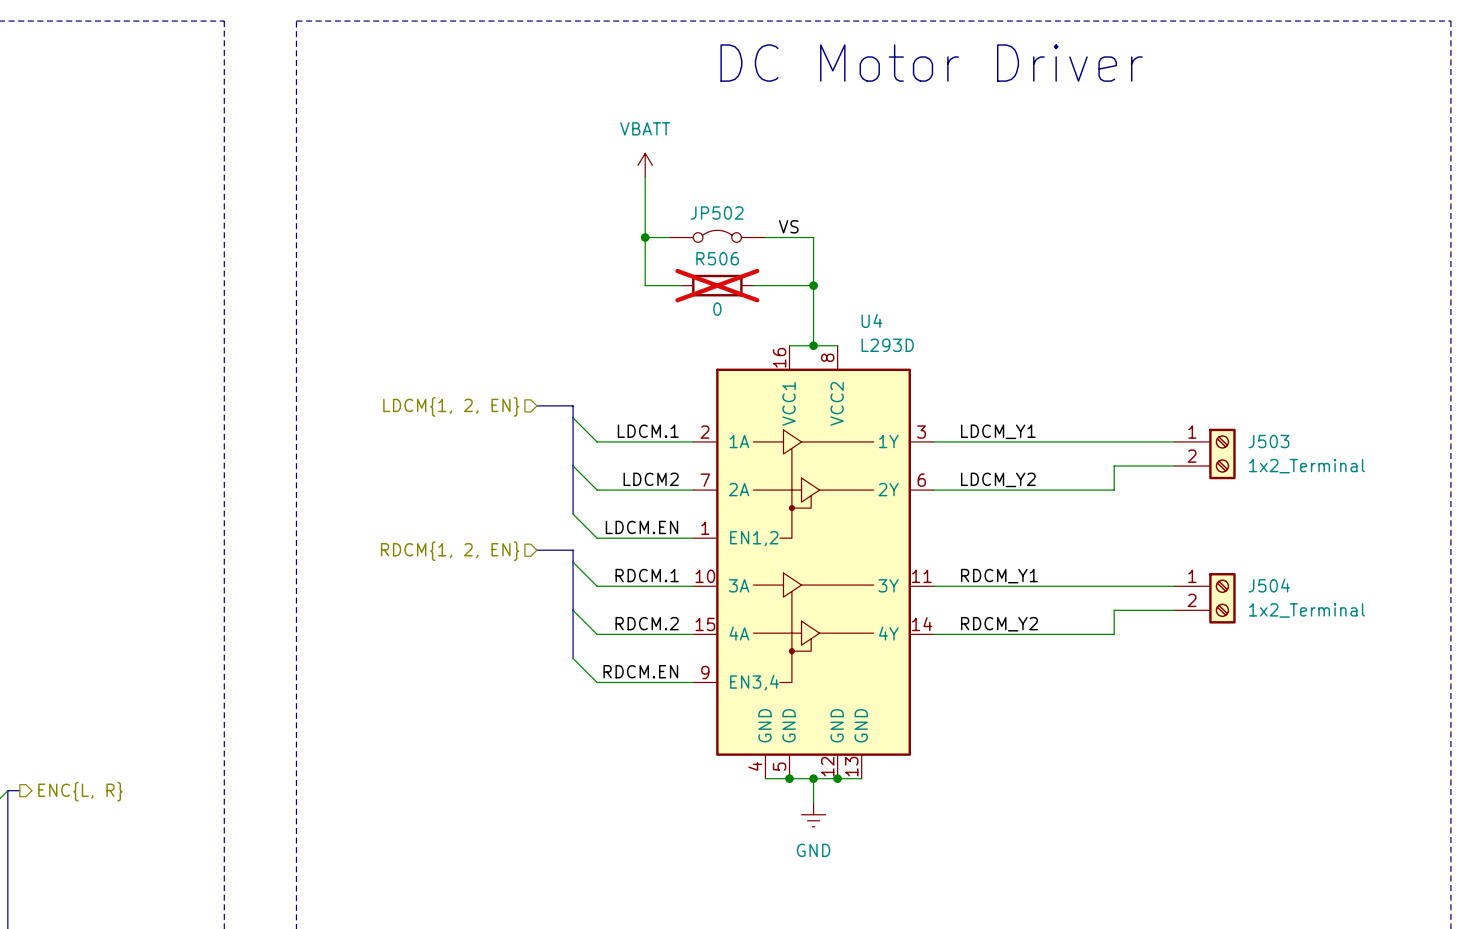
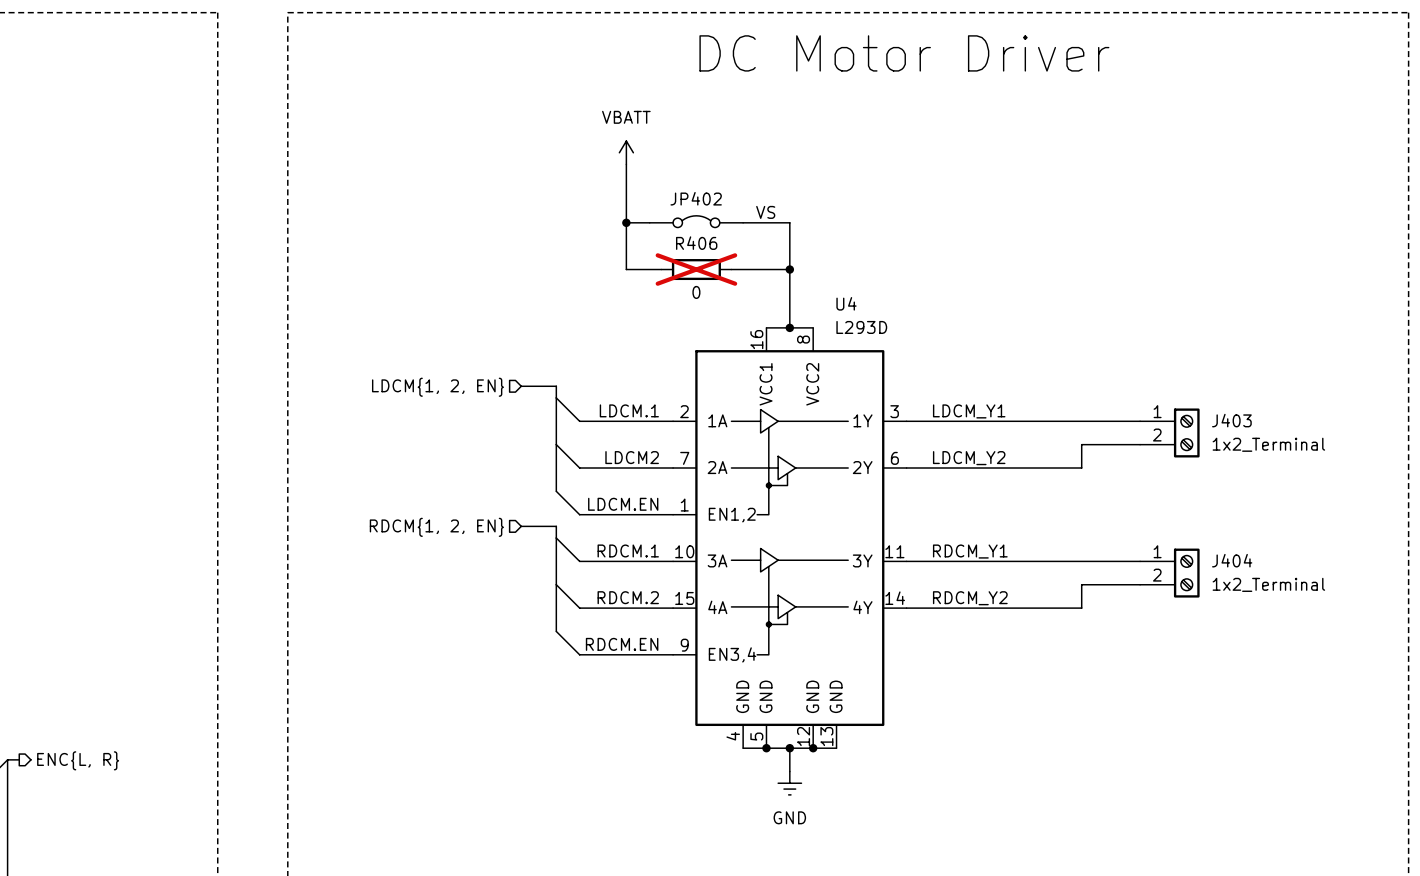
JP502 name: JP502 (717, 213) -> JP402 (696, 198)
R506 name: R506 (717, 258) -> R406 (696, 243)
J503 name: J503 (1268, 441) -> J403 (1231, 420)
J504 name: J504 (1269, 585) -> J404 (1232, 560)

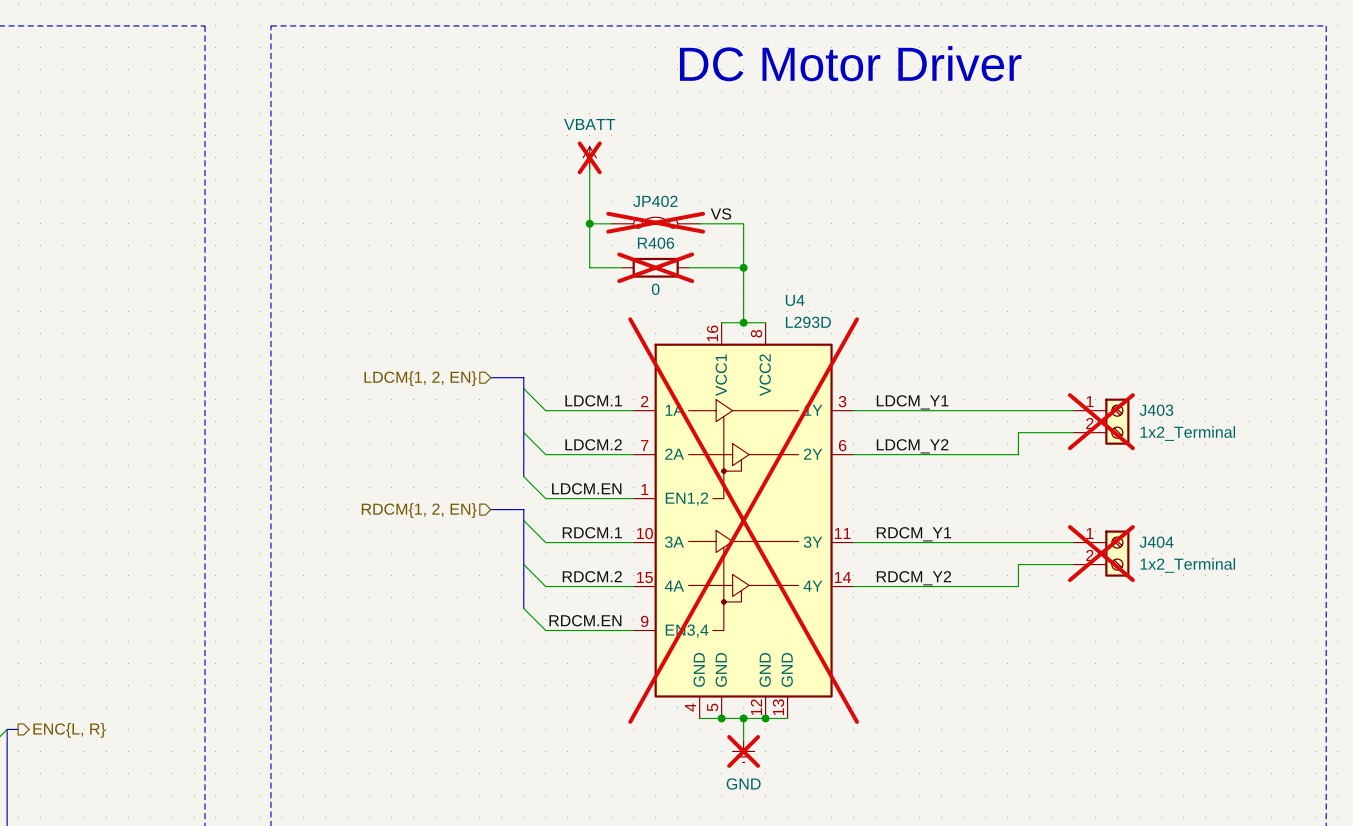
power symbol do-not-place cross: none -> (589, 157)
JP402 do-not-place cross: none -> (655, 222)
J403 do-not-place cross: none -> (1101, 421)
label: LDCM2 (632, 457) -> LDCM.2 (593, 444)
U4 do-not-place cross: none -> (743, 520)
J404 do-not-place cross: none -> (1101, 553)
power symbol do-not-place cross: none -> (743, 751)

